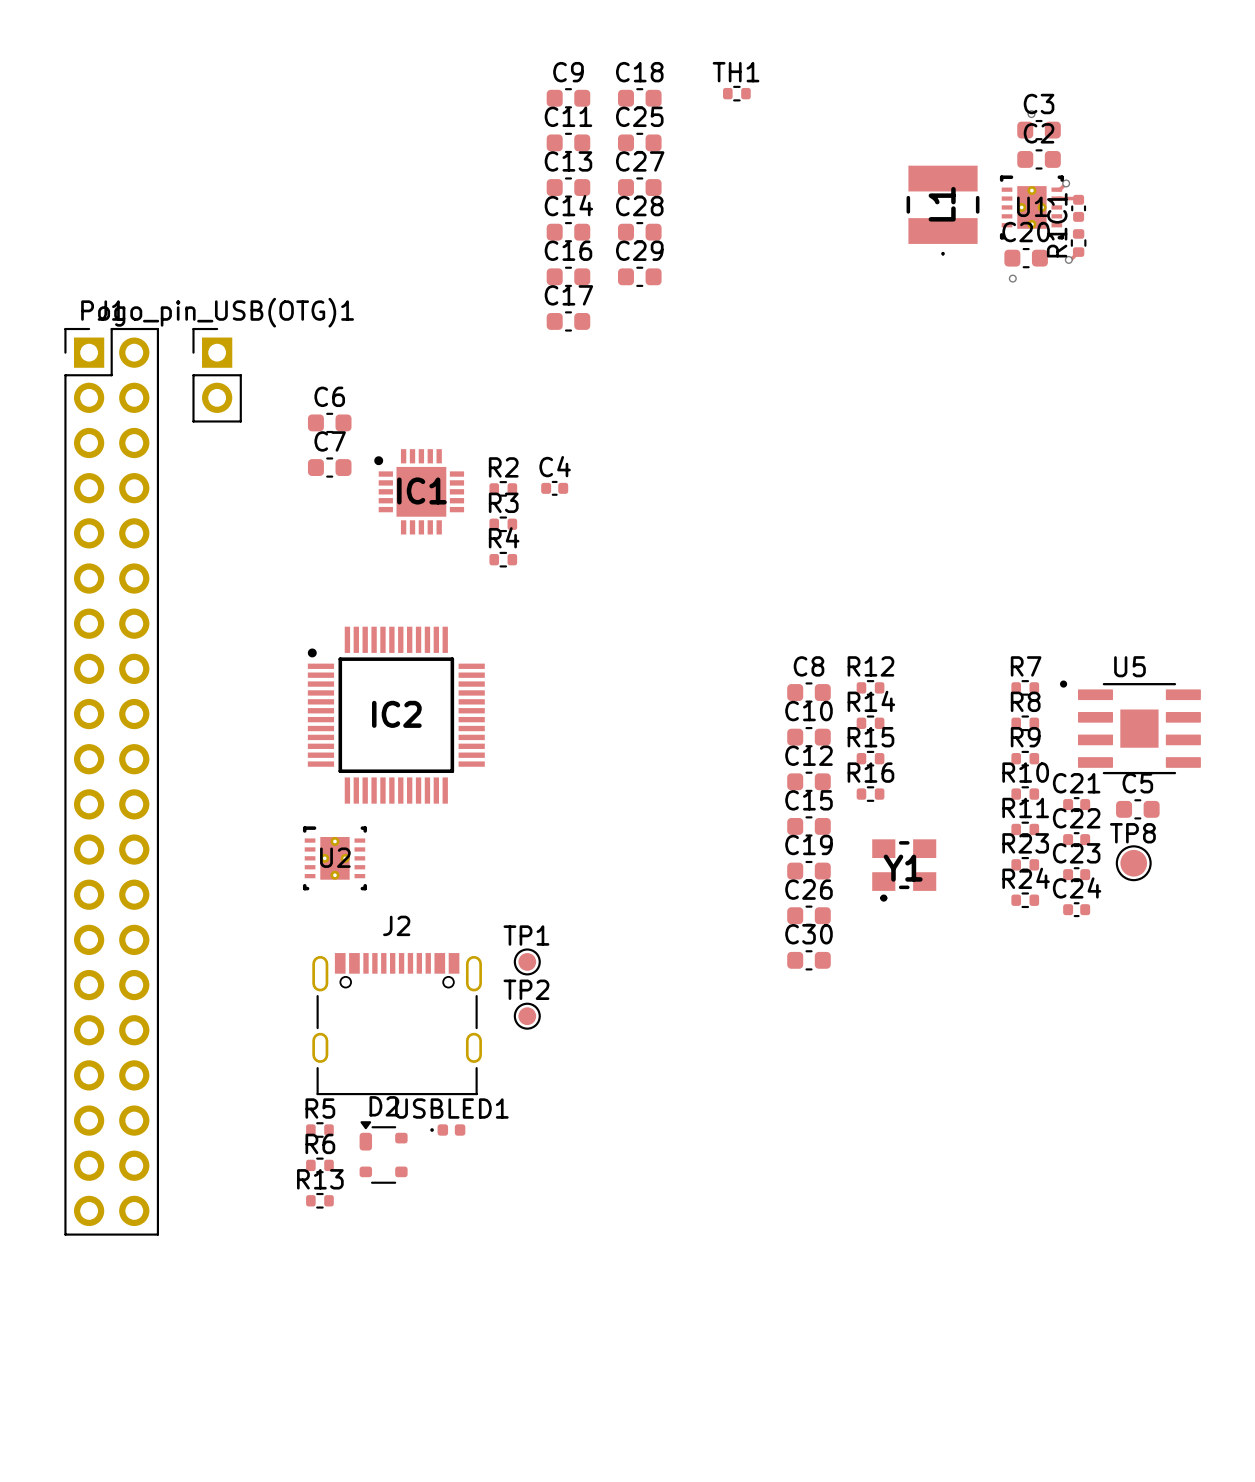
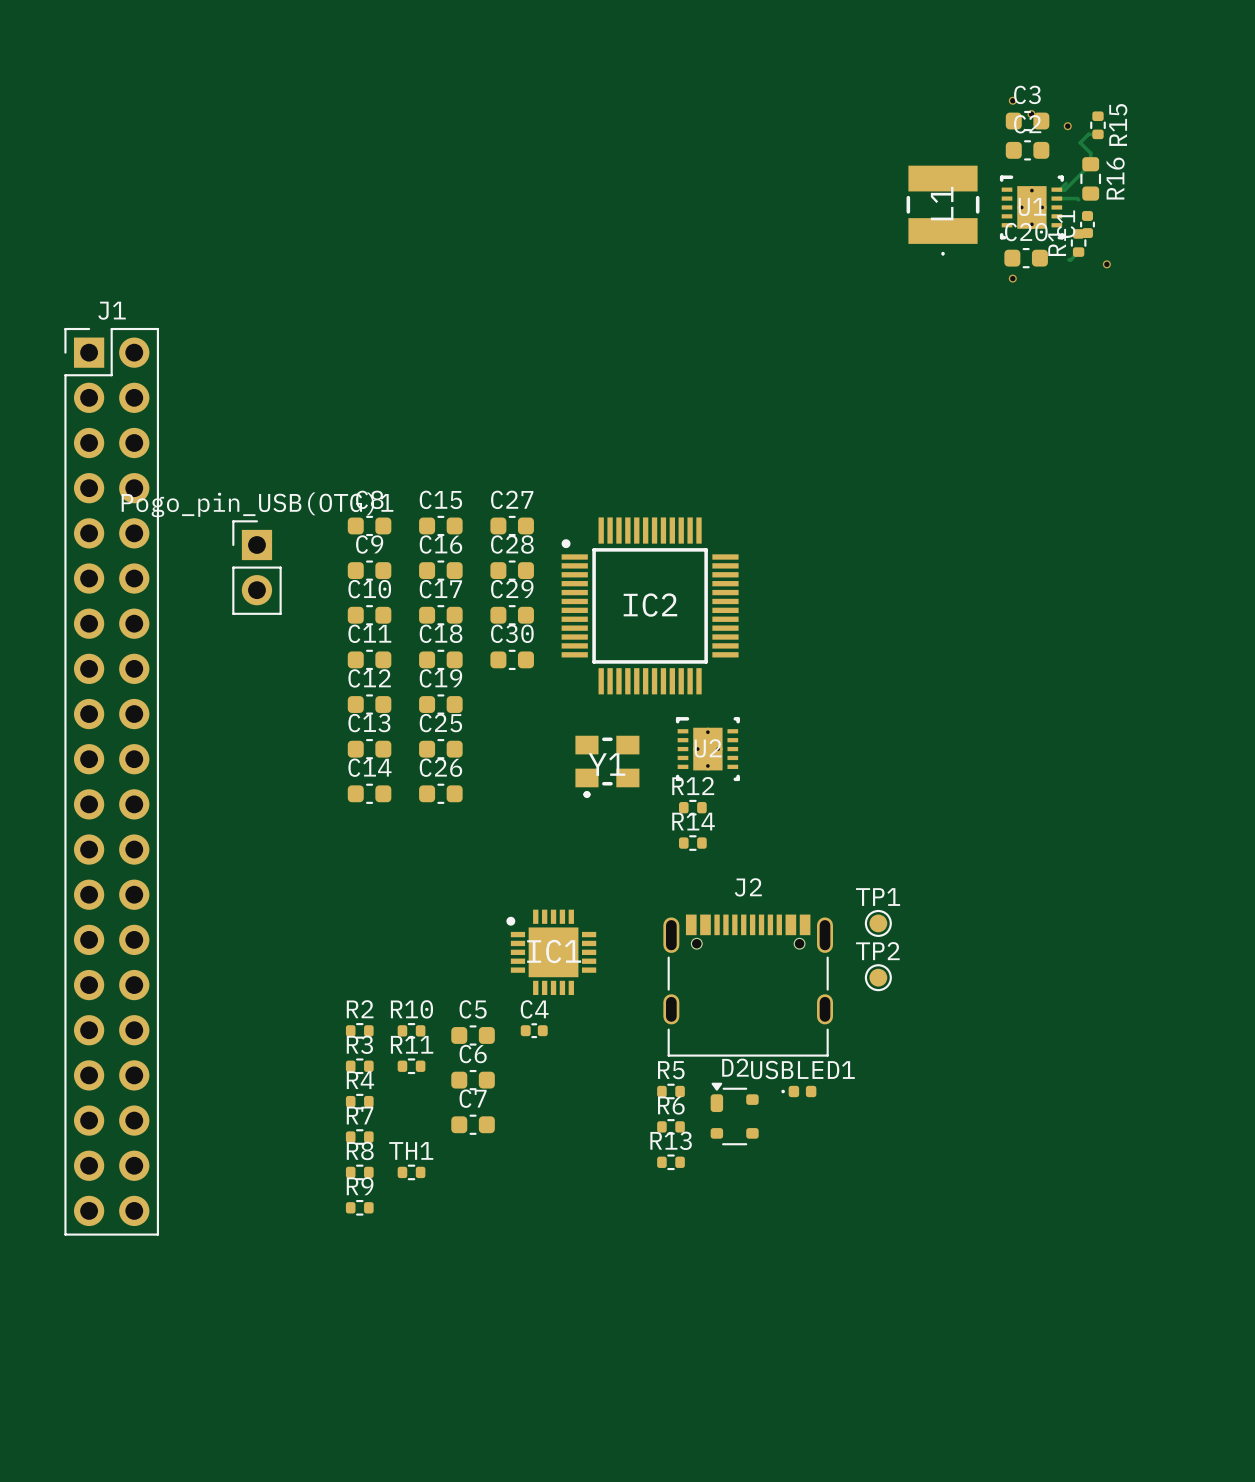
TH1 position: (736, 93) -> (411, 1172)
C9 position: (568, 98) -> (369, 570)
C18 position: (639, 98) -> (440, 659)
via: none -> (1012, 100)
via: none -> (1067, 126)
C3 position: (1039, 130) -> (1027, 121)
track: none -> (1097, 134) (1088, 134) (1080, 142) (1090, 153) (1090, 164) (1064, 190) (1059, 190)
C11 position: (568, 142) -> (369, 659)
C25 position: (639, 142) -> (440, 749)
C2 position: (1039, 159) -> (1027, 150)
via: (1066, 183) -> none
C13 position: (568, 187) -> (369, 749)
C27 position: (639, 187) -> (512, 525)
C1 position: (1078, 208) -> (1087, 224)
C14 position: (568, 232) -> (369, 793)
C28 position: (639, 232) -> (512, 570)
via position: (1068, 259) -> (1106, 264)
C16 position: (568, 276) -> (440, 570)
C29 position: (639, 276) -> (512, 615)
C17 position: (568, 321) -> (440, 615)
Pogo_pin_USB(OTG)1 position: (217, 375) -> (256, 567)
C6 position: (329, 422) -> (473, 1080)
C7 position: (329, 467) -> (473, 1124)
R2 position: (503, 488) -> (359, 1030)
C4 position: (554, 488) -> (534, 1030)
IC1 position: (419, 491) -> (551, 952)
R3 position: (503, 524) -> (359, 1066)
R4 position: (503, 559) -> (359, 1101)
R12 position: (870, 687) -> (692, 807)
R7 position: (1025, 687) -> (359, 1137)
C8 position: (809, 692) -> (369, 525)
IC2 position: (396, 715) -> (650, 605)
R14 position: (870, 723) -> (692, 843)
R8 position: (1025, 723) -> (359, 1172)
U5: (1130, 727) -> none
C10 position: (809, 737) -> (369, 615)
R15 rotation: 0° (870, 758) -> 90° clockwise (1097, 125)
R15 position: (870, 758) -> (1097, 125)
R9 position: (1025, 758) -> (359, 1207)
C12 position: (809, 781) -> (369, 704)
R16 footprint: [856, 786, 885, 802] -> [1080, 157, 1102, 201]
R10 position: (1025, 794) -> (411, 1030)
C21: (1076, 804) -> none
C5 position: (1137, 809) -> (473, 1035)
C15 position: (809, 826) -> (440, 525)
R11 position: (1025, 829) -> (411, 1066)
C22: (1076, 839) -> none
U2 position: (334, 858) -> (707, 749)
TP8: (1133, 863) -> none
R23: (1025, 864) -> none
Y1 position: (904, 870) -> (607, 766)
C19 position: (809, 871) -> (440, 704)
C23: (1076, 874) -> none
R24: (1025, 900) -> none
C24: (1076, 909) -> none
C26 position: (809, 915) -> (440, 793)
C30 position: (809, 960) -> (512, 659)
TP1 position: (527, 961) -> (878, 923)
TP2 position: (527, 1016) -> (878, 977)
J2 position: (397, 1024) -> (748, 985)
R5 position: (319, 1130) -> (670, 1091)
USBLED1 position: (447, 1130) -> (798, 1091)
D2 position: (383, 1152) -> (734, 1114)
R6 position: (319, 1165) -> (670, 1126)
R13 position: (319, 1200) -> (670, 1162)

